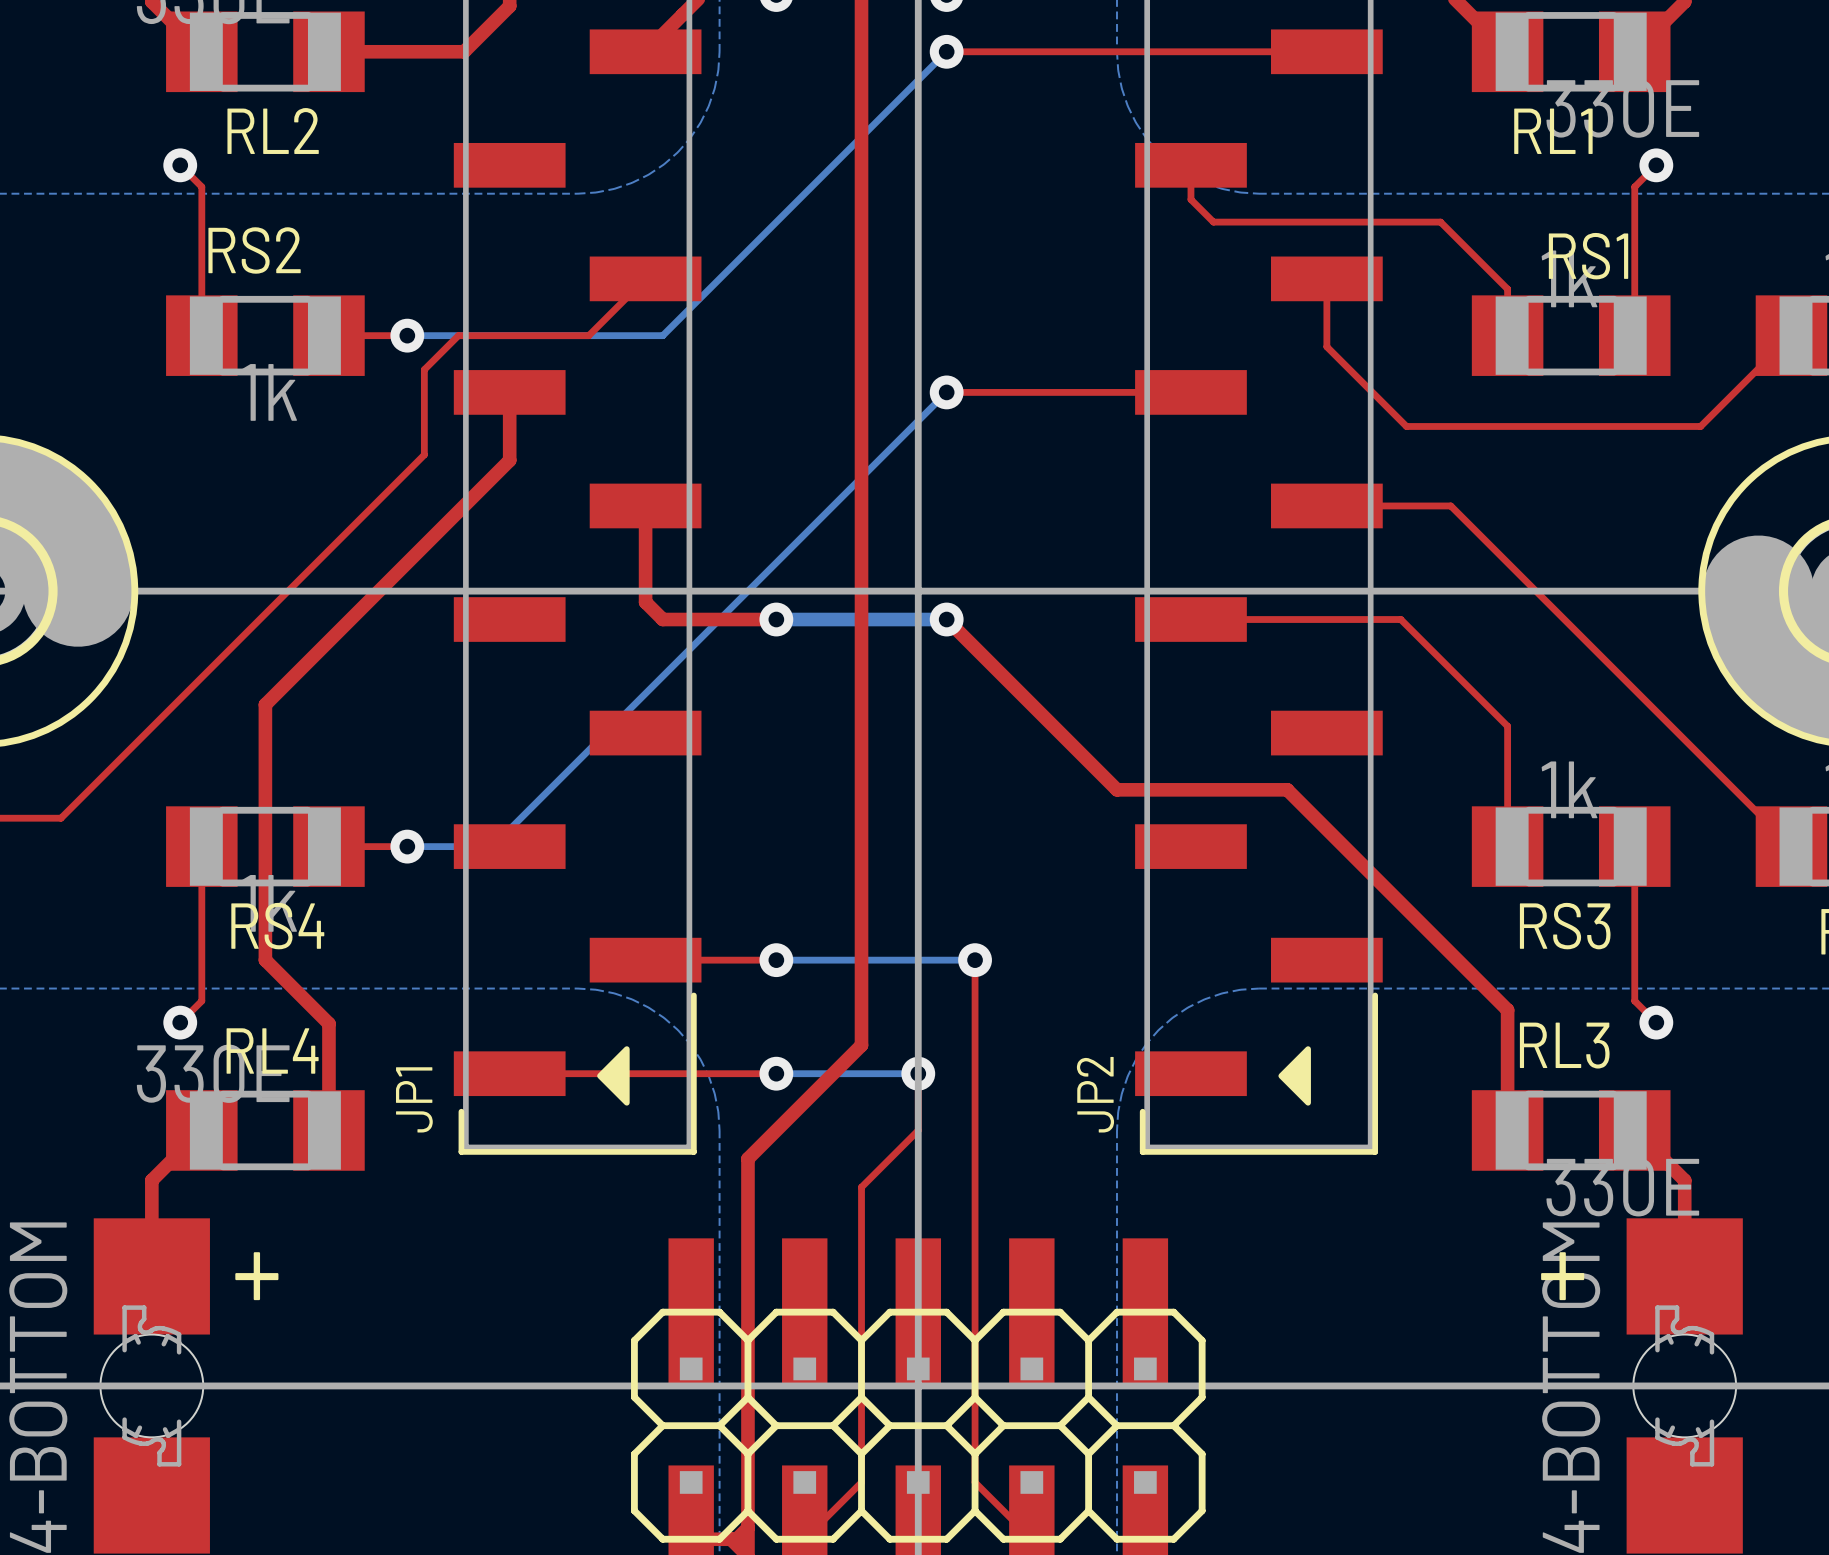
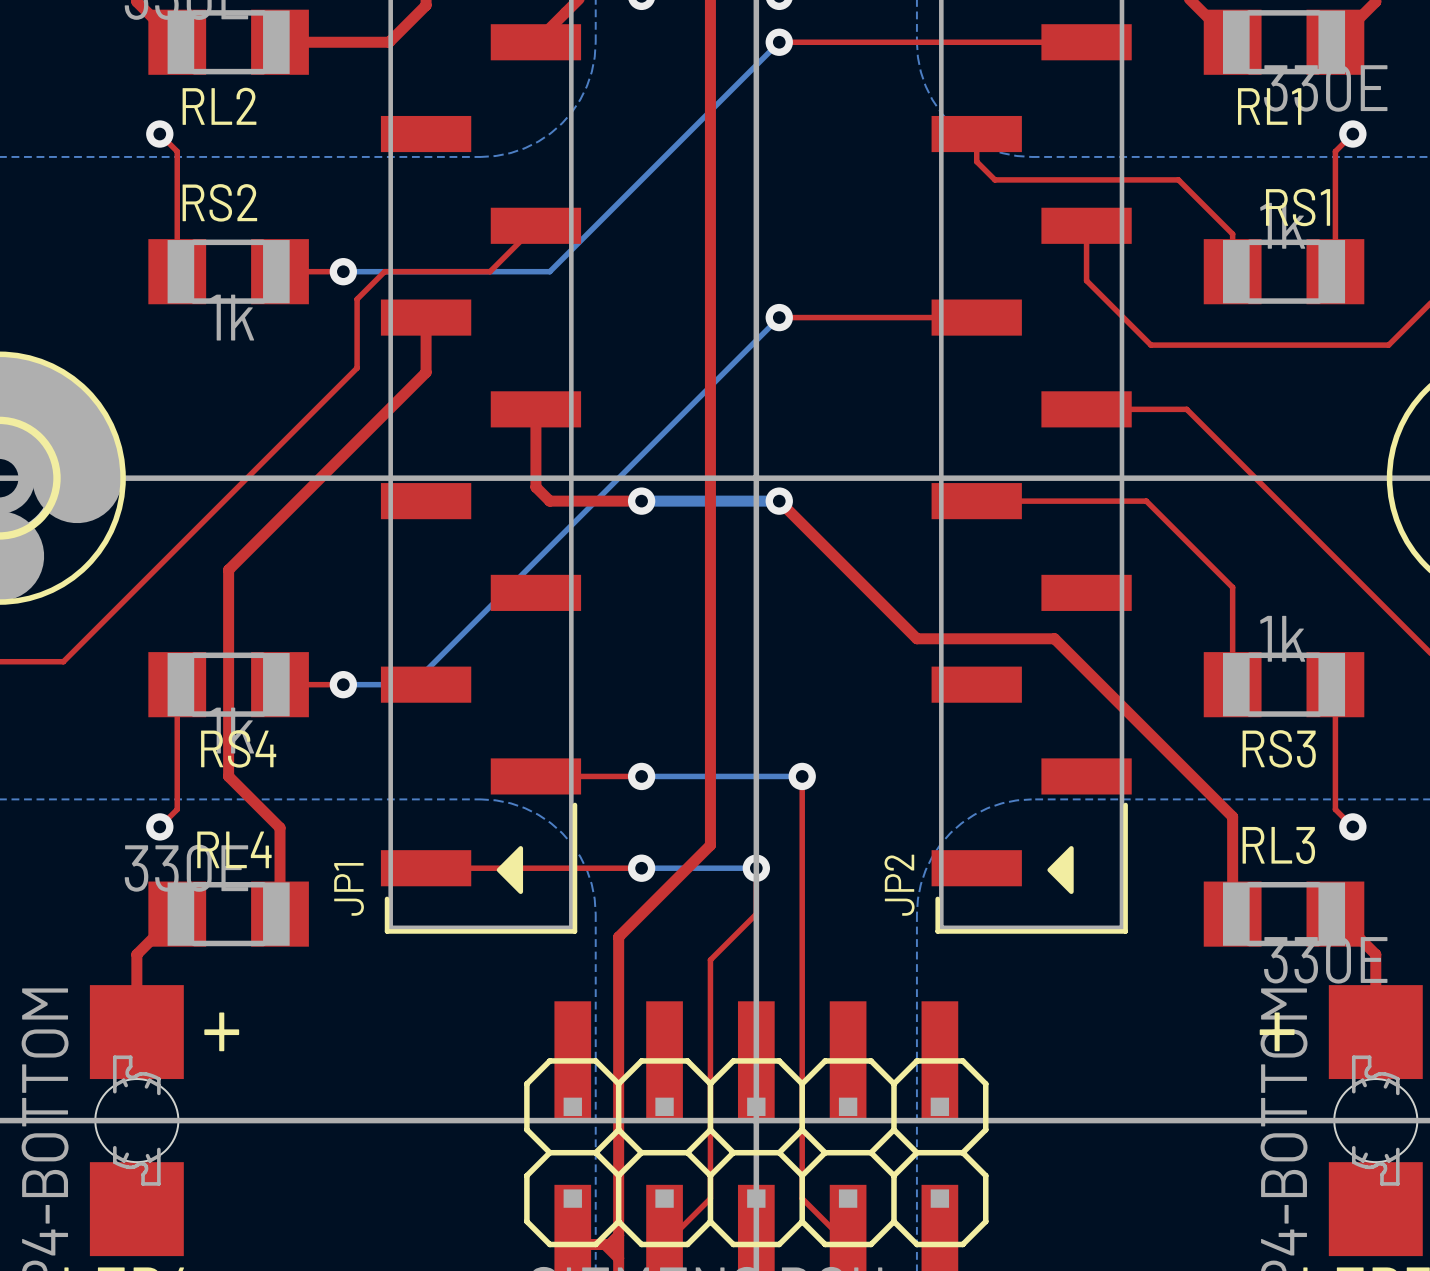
RL2 name position: RL2 (273, 131) -> RL2 (219, 106)

